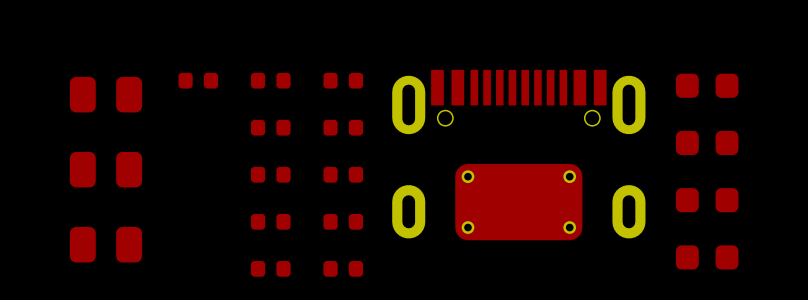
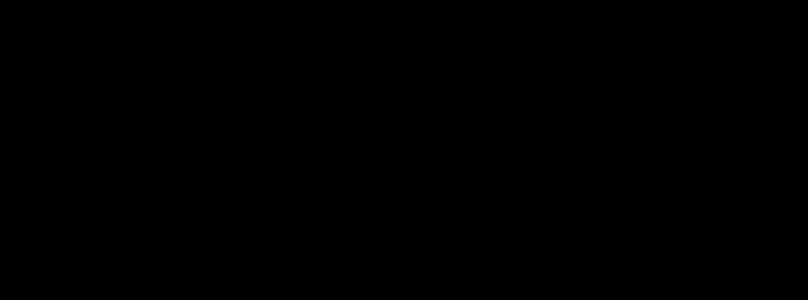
part: (198, 80) -> none
part: (270, 80) -> none
part: (343, 80) -> none
part: (707, 85) -> none
part: (105, 94) -> none
part: (270, 127) -> none
part: (343, 127) -> none
part: (707, 142) -> none
part: (518, 155) -> none
part: (105, 169) -> none
part: (270, 174) -> none
part: (343, 174) -> none
part: (707, 200) -> none
part: (270, 221) -> none
part: (343, 221) -> none
part: (105, 244) -> none
part: (707, 257) -> none
part: (270, 268) -> none
part: (343, 268) -> none

